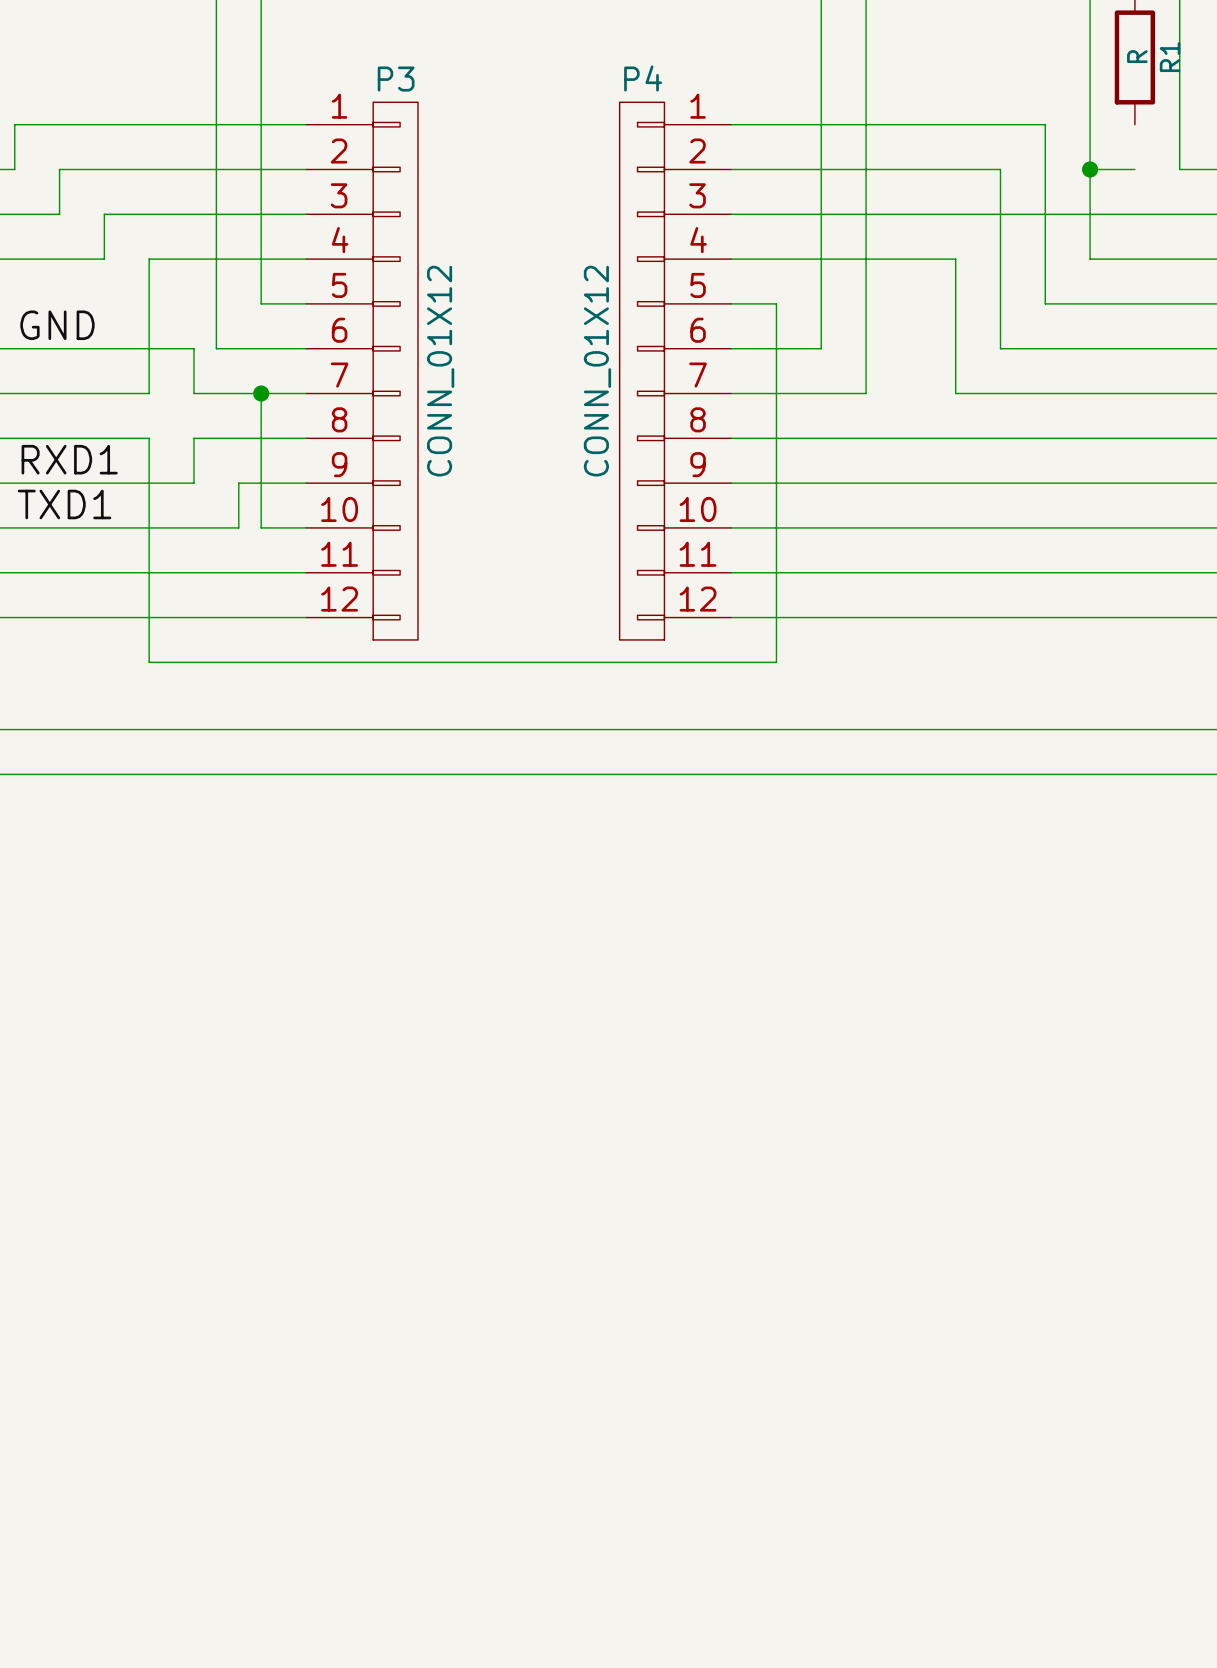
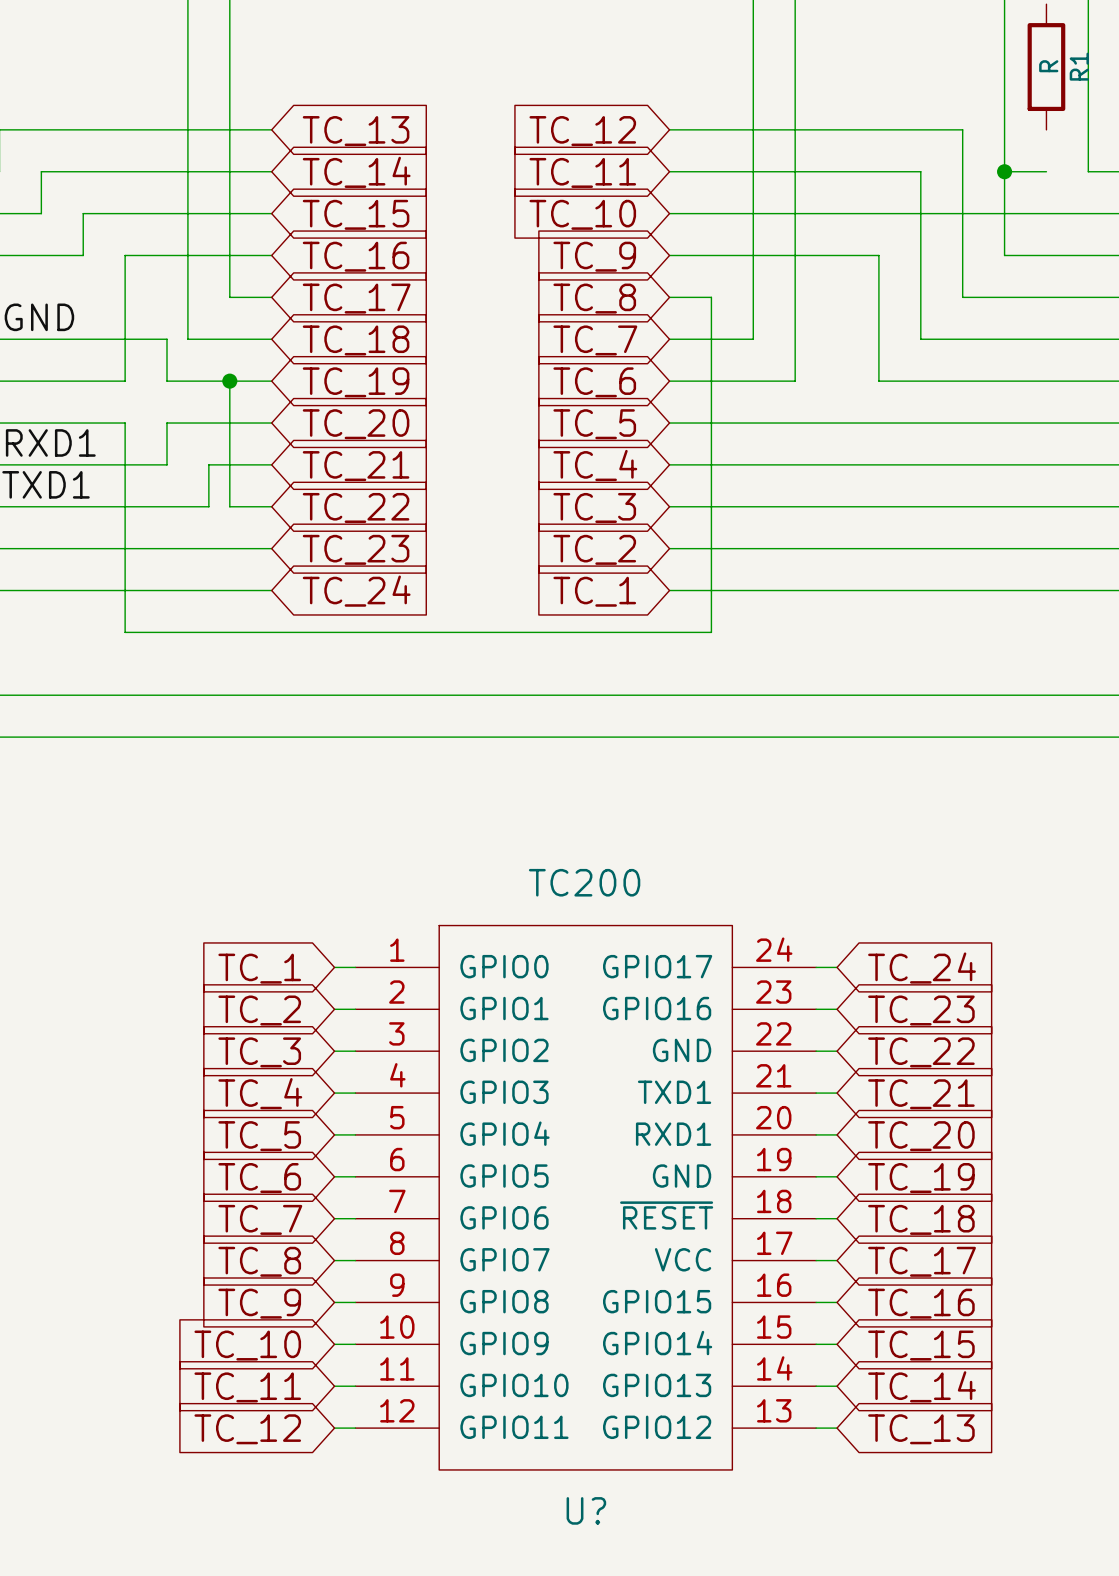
global label: none -> TC_13 (356, 131)
global label: none -> TC_12 (582, 131)
global label: none -> TC_14 (356, 172)
global label: none -> TC_11 (582, 172)
global label: none -> TC_15 (356, 214)
global label: none -> TC_10 (582, 214)
global label: none -> TC_16 (356, 256)
global label: none -> TC_9 (594, 256)
global label: none -> TC_17 (356, 298)
global label: none -> TC_8 (594, 298)
global label: none -> TC_18 (356, 340)
global label: none -> TC_7 (595, 340)
P3: CONN_01X12 (362, 371) -> none
P4: CONN_01X12 (675, 371) -> none
global label: none -> TC_19 (356, 382)
global label: none -> TC_6 (594, 382)
global label: none -> TC_20 (356, 424)
global label: none -> TC_5 (594, 424)
global label: none -> TC_4 (595, 465)
global label: none -> TC_21 (356, 466)
global label: none -> TC_22 (356, 507)
global label: none -> TC_3 (594, 507)
global label: none -> TC_23 (356, 549)
global label: none -> TC_2 (594, 549)
global label: none -> TC_24 (356, 591)
global label: none -> TC_1 (594, 591)
wire: none -> (334, 967) (355, 967)
wire: none -> (816, 967) (837, 967)
global label: none -> TC_24 (922, 968)
global label: none -> TC_1 (259, 968)
wire: none -> (334, 1009) (355, 1009)
wire: none -> (816, 1009) (837, 1009)
global label: none -> TC_2 (259, 1010)
global label: none -> TC_23 (921, 1010)
wire: none -> (334, 1051) (355, 1051)
wire: none -> (816, 1051) (837, 1051)
global label: none -> TC_3 (259, 1052)
global label: none -> TC_22 (921, 1052)
global label: none -> TC_4 (260, 1093)
wire: none -> (334, 1093) (355, 1093)
wire: none -> (816, 1093) (837, 1093)
global label: none -> TC_21 (921, 1094)
wire: none -> (334, 1134) (355, 1134)
wire: none -> (816, 1134) (837, 1134)
global label: none -> TC_5 (259, 1136)
global label: none -> TC_20 (921, 1136)
wire: none -> (334, 1176) (355, 1176)
wire: none -> (816, 1176) (837, 1176)
global label: none -> TC_6 (259, 1178)
global label: none -> TC_19 (921, 1178)
U?: none -> TC200 (585, 1197)
wire: none -> (334, 1218) (355, 1218)
wire: none -> (816, 1218) (837, 1218)
global label: none -> TC_7 (260, 1219)
global label: none -> TC_18 (921, 1219)
wire: none -> (334, 1260) (355, 1260)
wire: none -> (816, 1260) (837, 1260)
global label: none -> TC_8 (259, 1261)
global label: none -> TC_17 (922, 1261)
wire: none -> (334, 1302) (355, 1302)
wire: none -> (816, 1302) (837, 1302)
global label: none -> TC_9 (259, 1303)
global label: none -> TC_16 (921, 1303)
wire: none -> (334, 1344) (355, 1344)
wire: none -> (816, 1344) (837, 1344)
global label: none -> TC_10 (247, 1345)
global label: none -> TC_15 (921, 1345)
wire: none -> (334, 1386) (355, 1386)
wire: none -> (816, 1386) (837, 1386)
global label: none -> TC_14 (922, 1386)
global label: none -> TC_11 (247, 1387)
wire: none -> (334, 1428) (355, 1428)
wire: none -> (816, 1428) (837, 1428)
global label: none -> TC_12 (247, 1429)
global label: none -> TC_13 (921, 1429)

